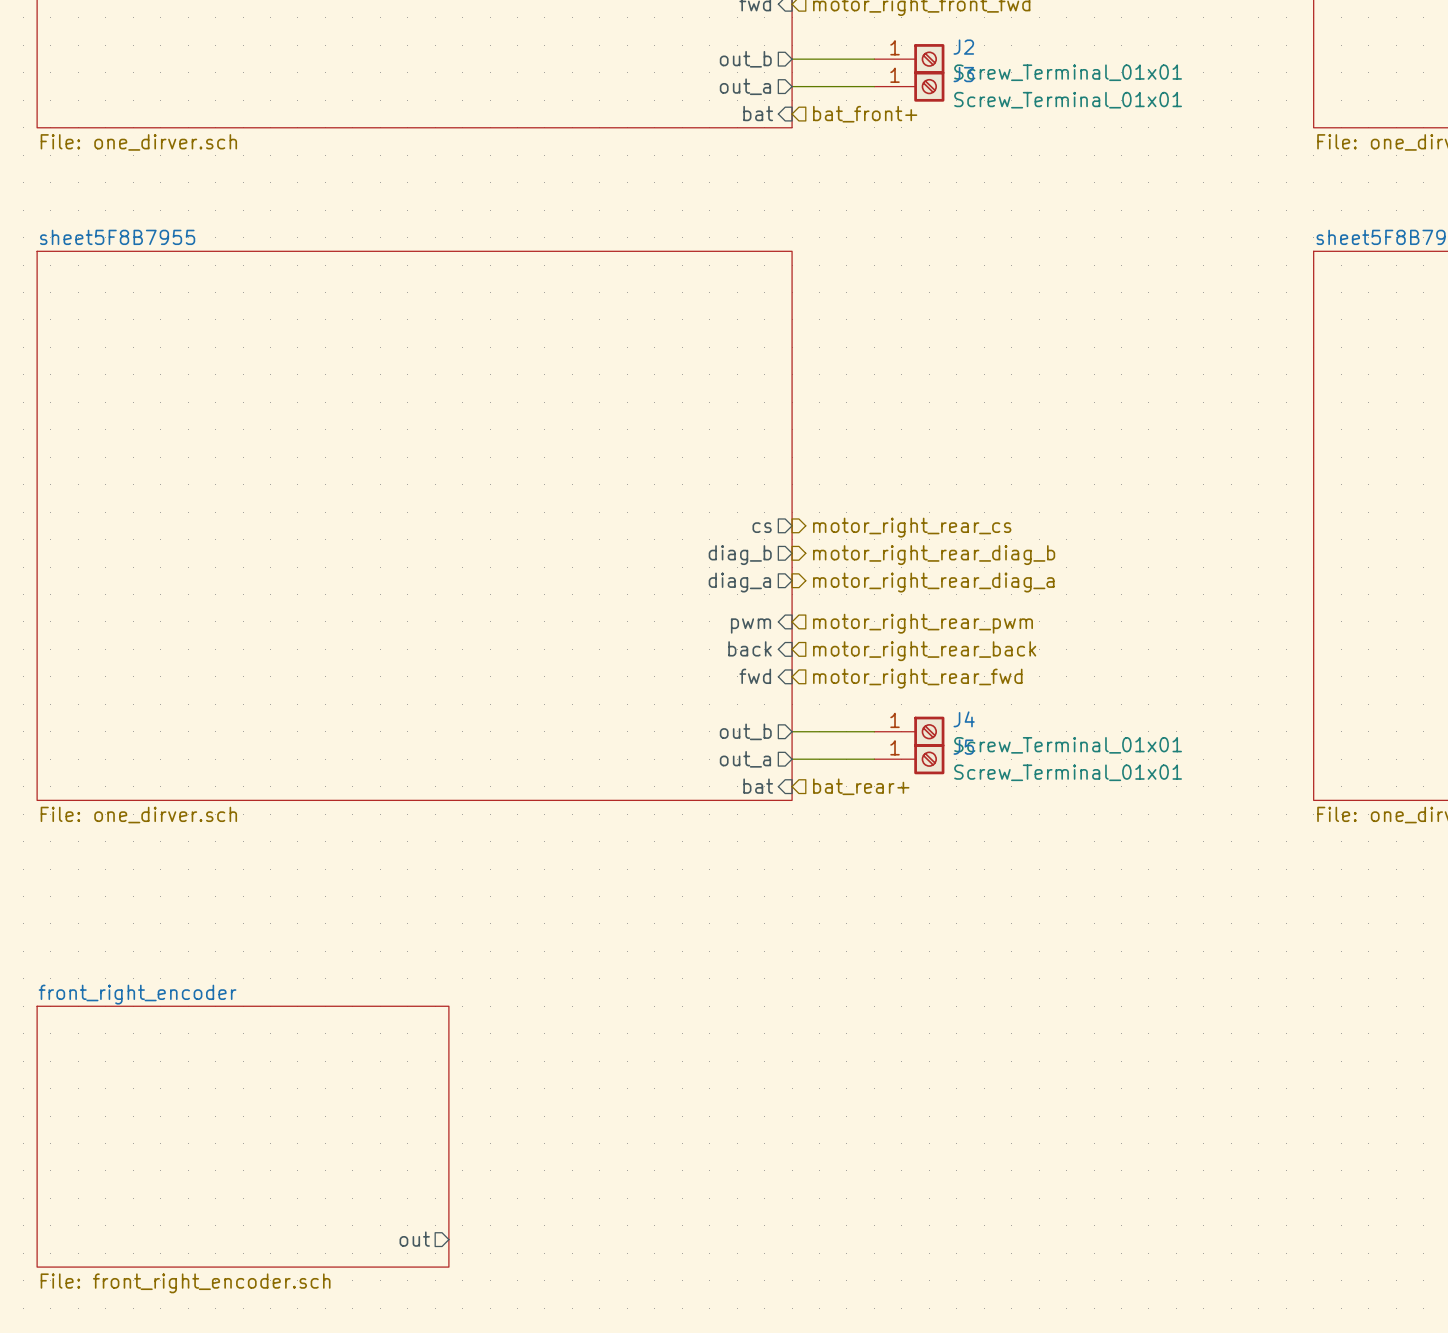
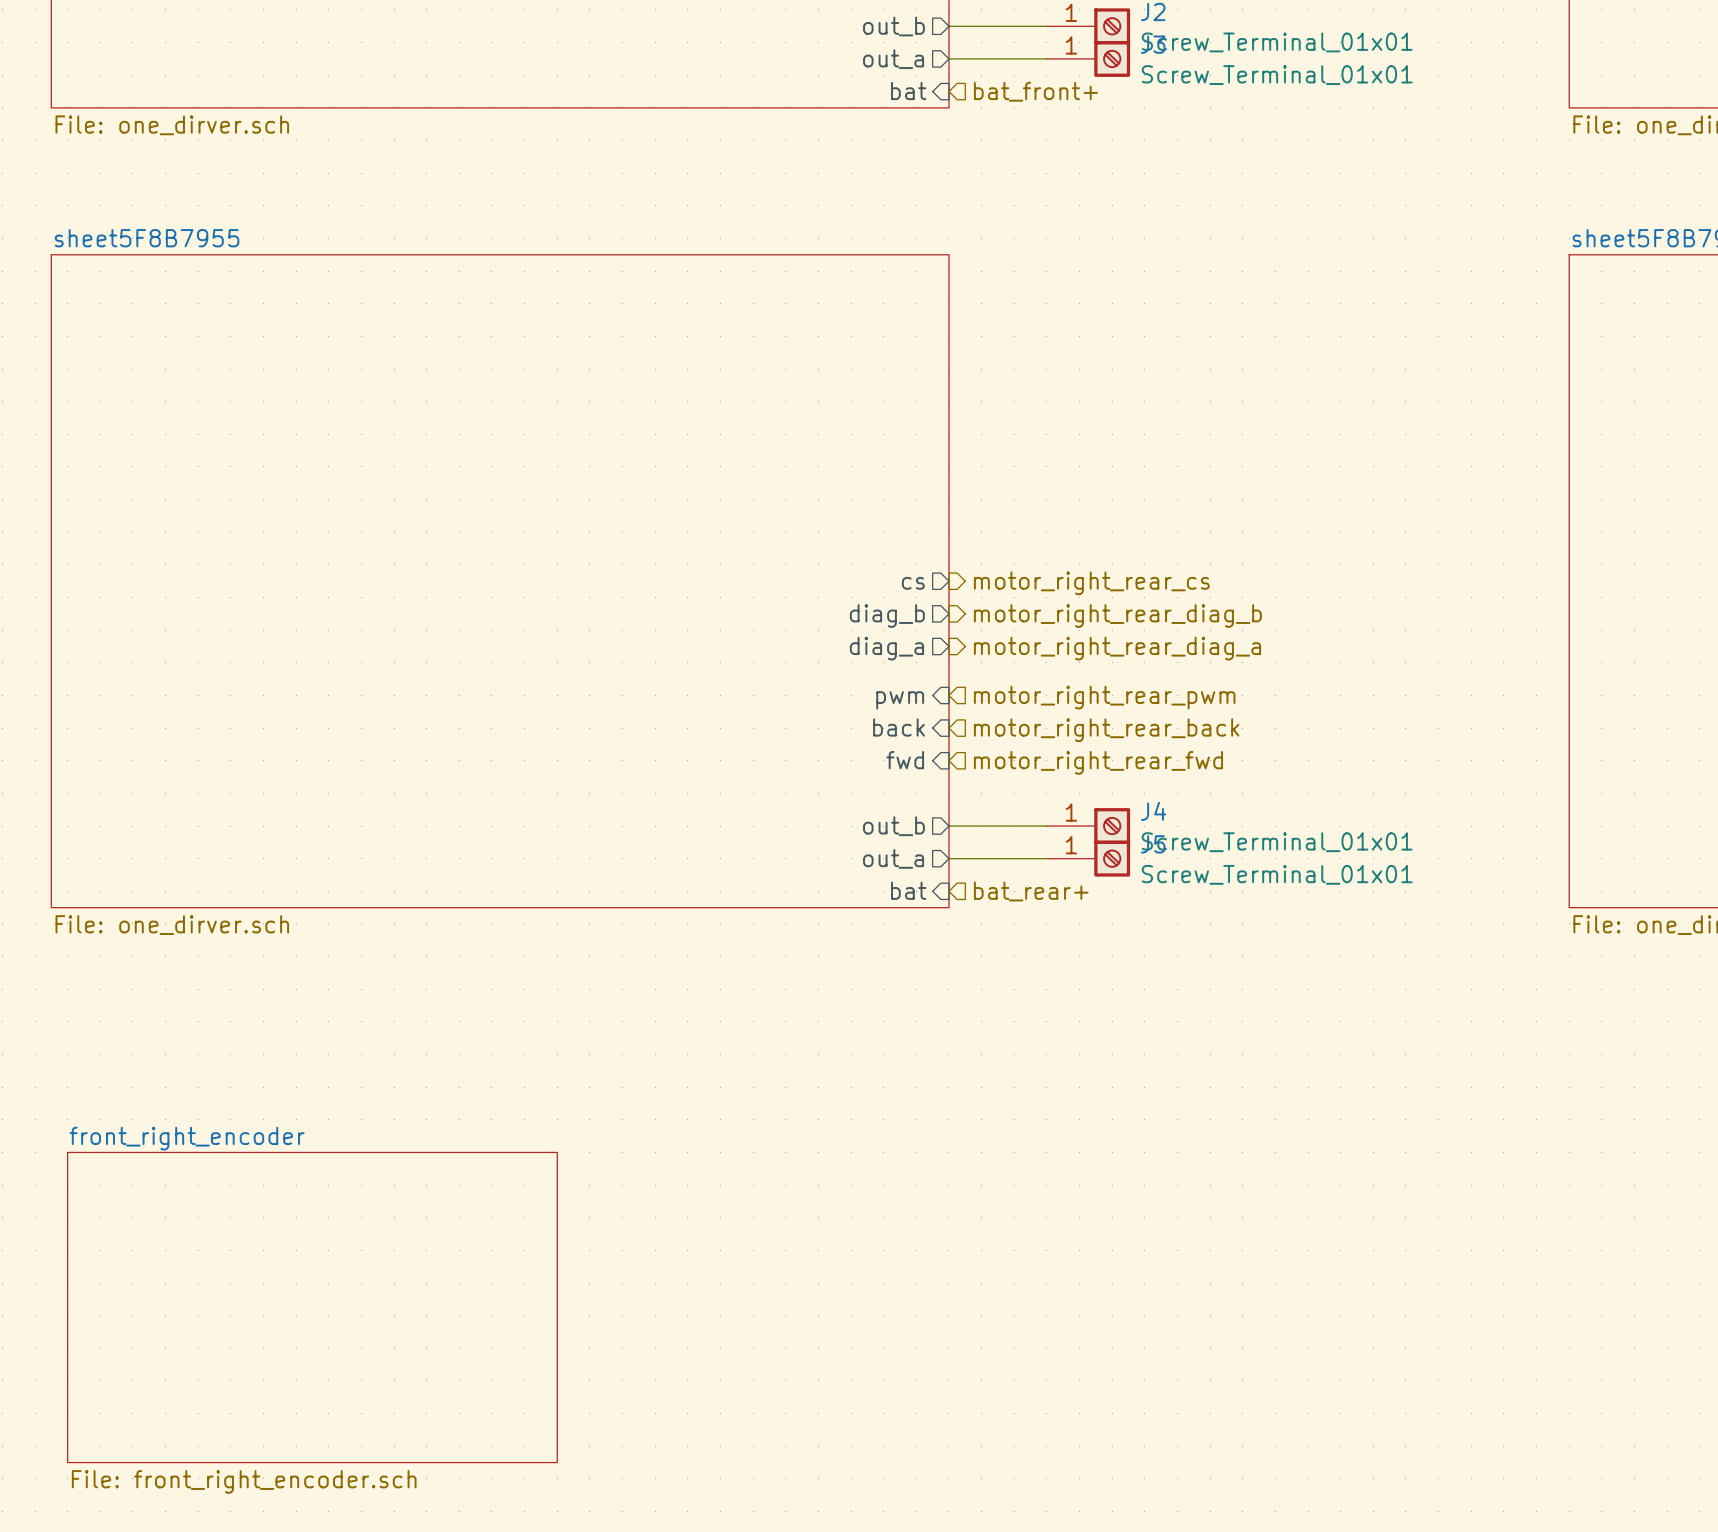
sheet front_right_encoder position: (243, 1136) -> (312, 1307)
sheet pin: out (414, 1239) -> none

